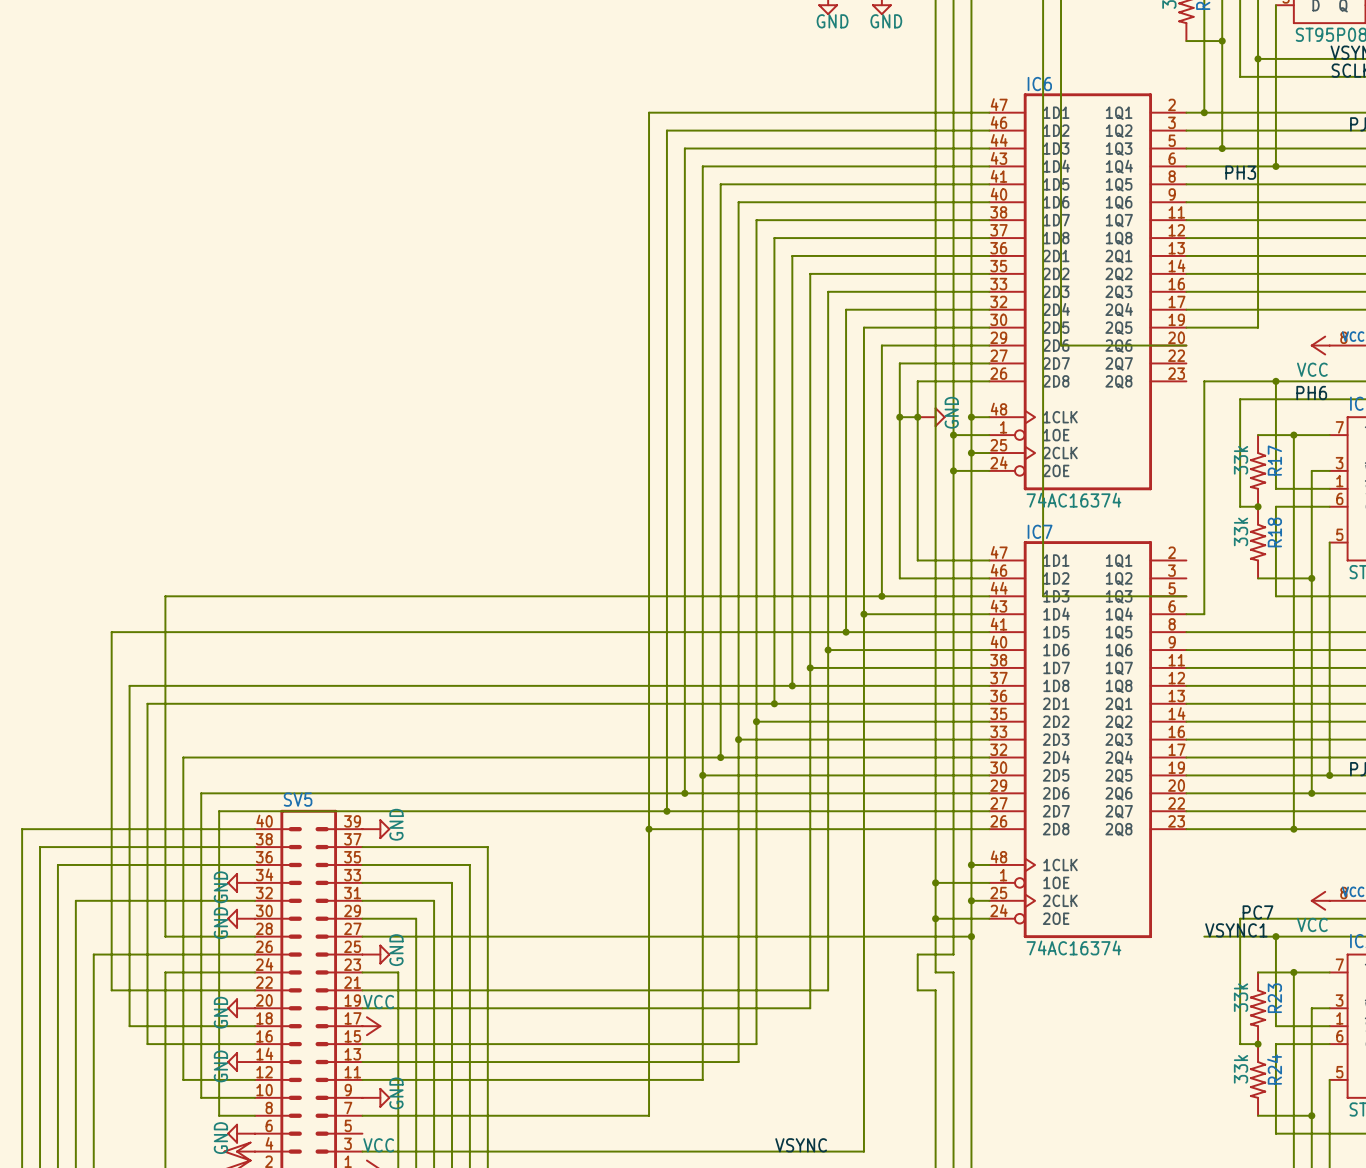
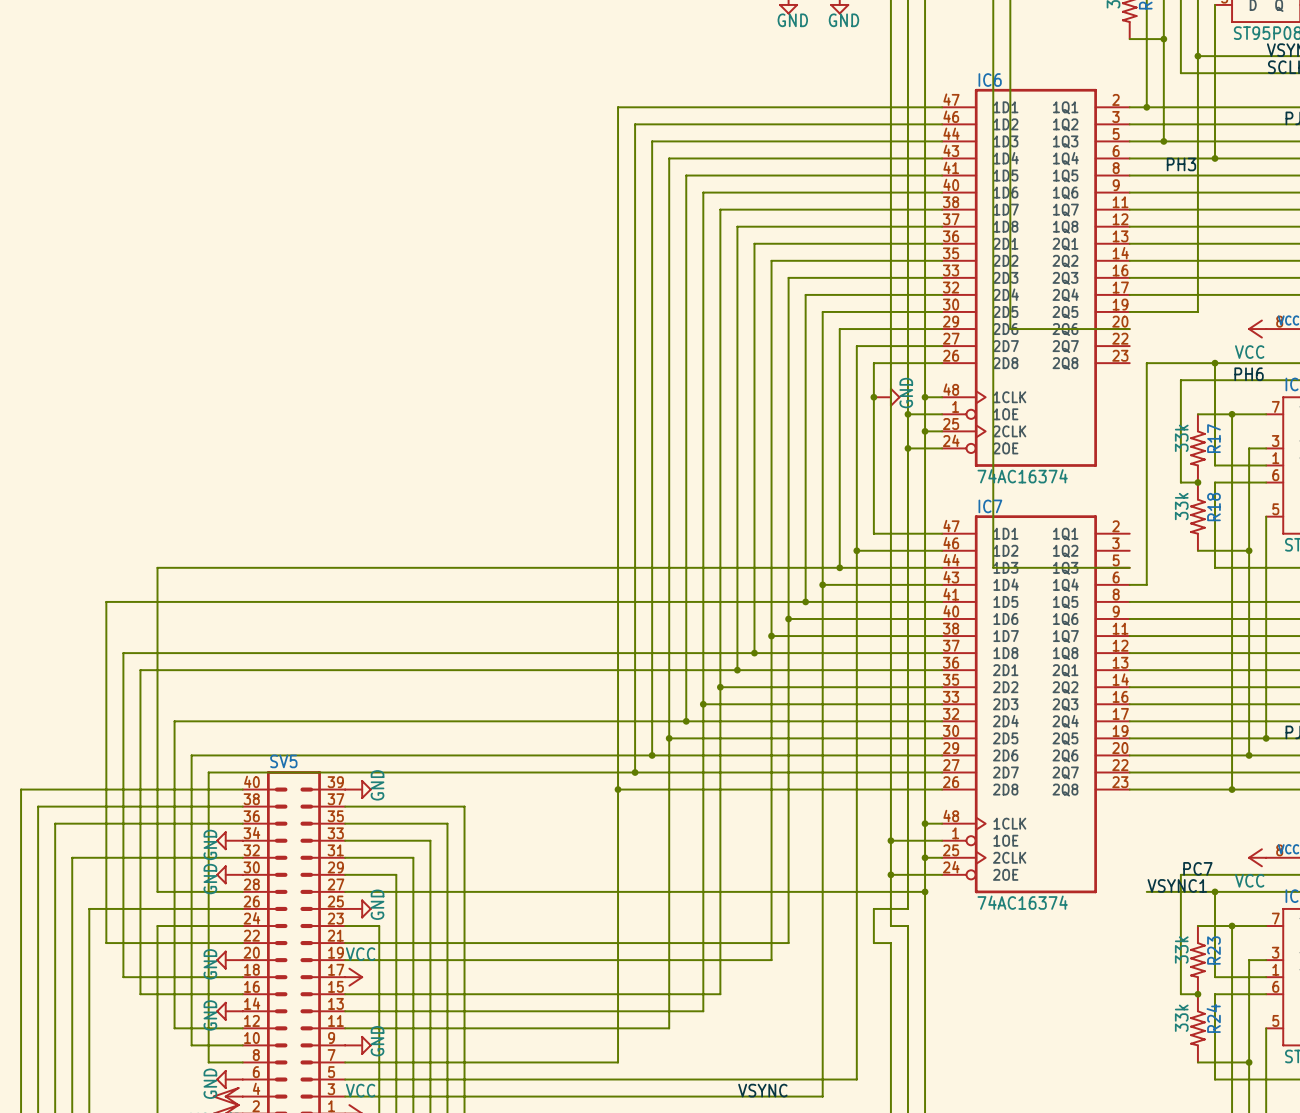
wire: (899, 417) (917, 417) -> none
junction: (899, 417) -> none
wire: none -> (856, 550) (856, 1079) (345, 1079)
junction: none -> (856, 550)

